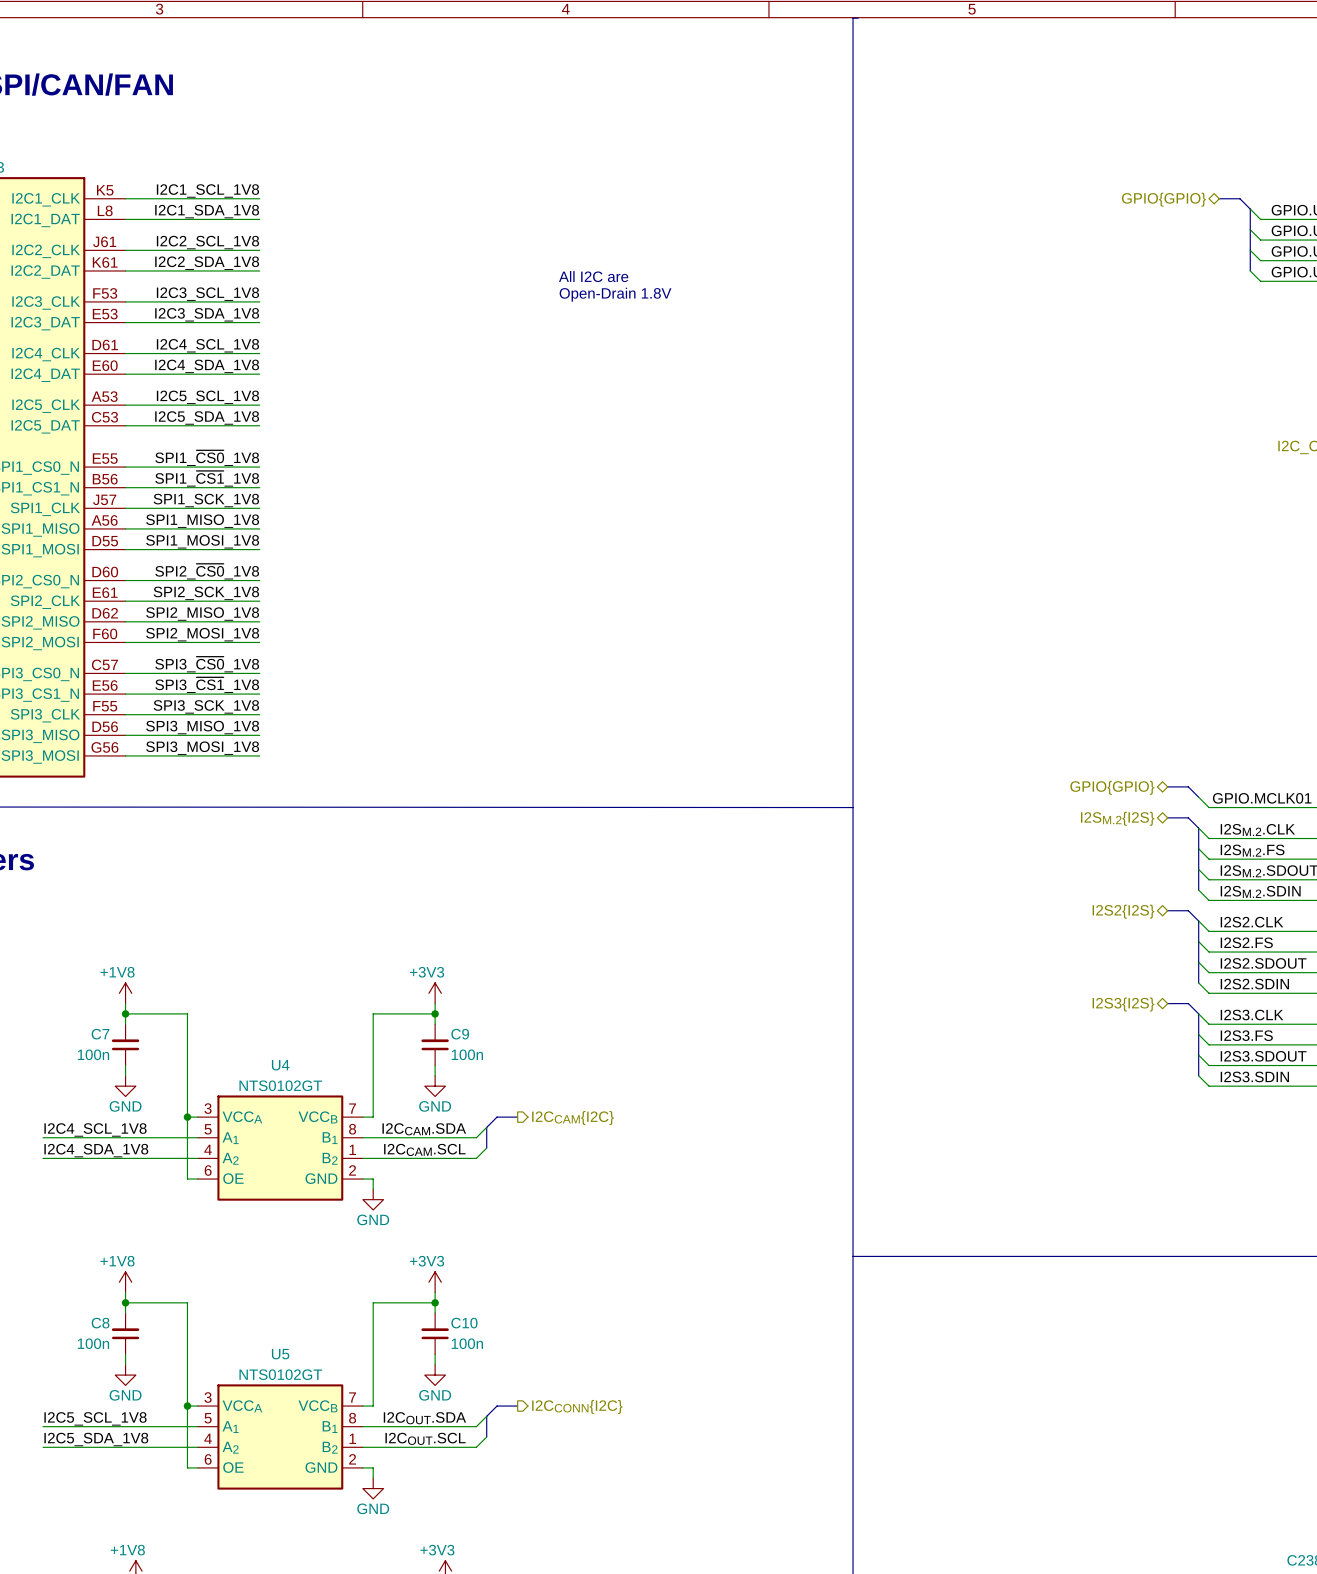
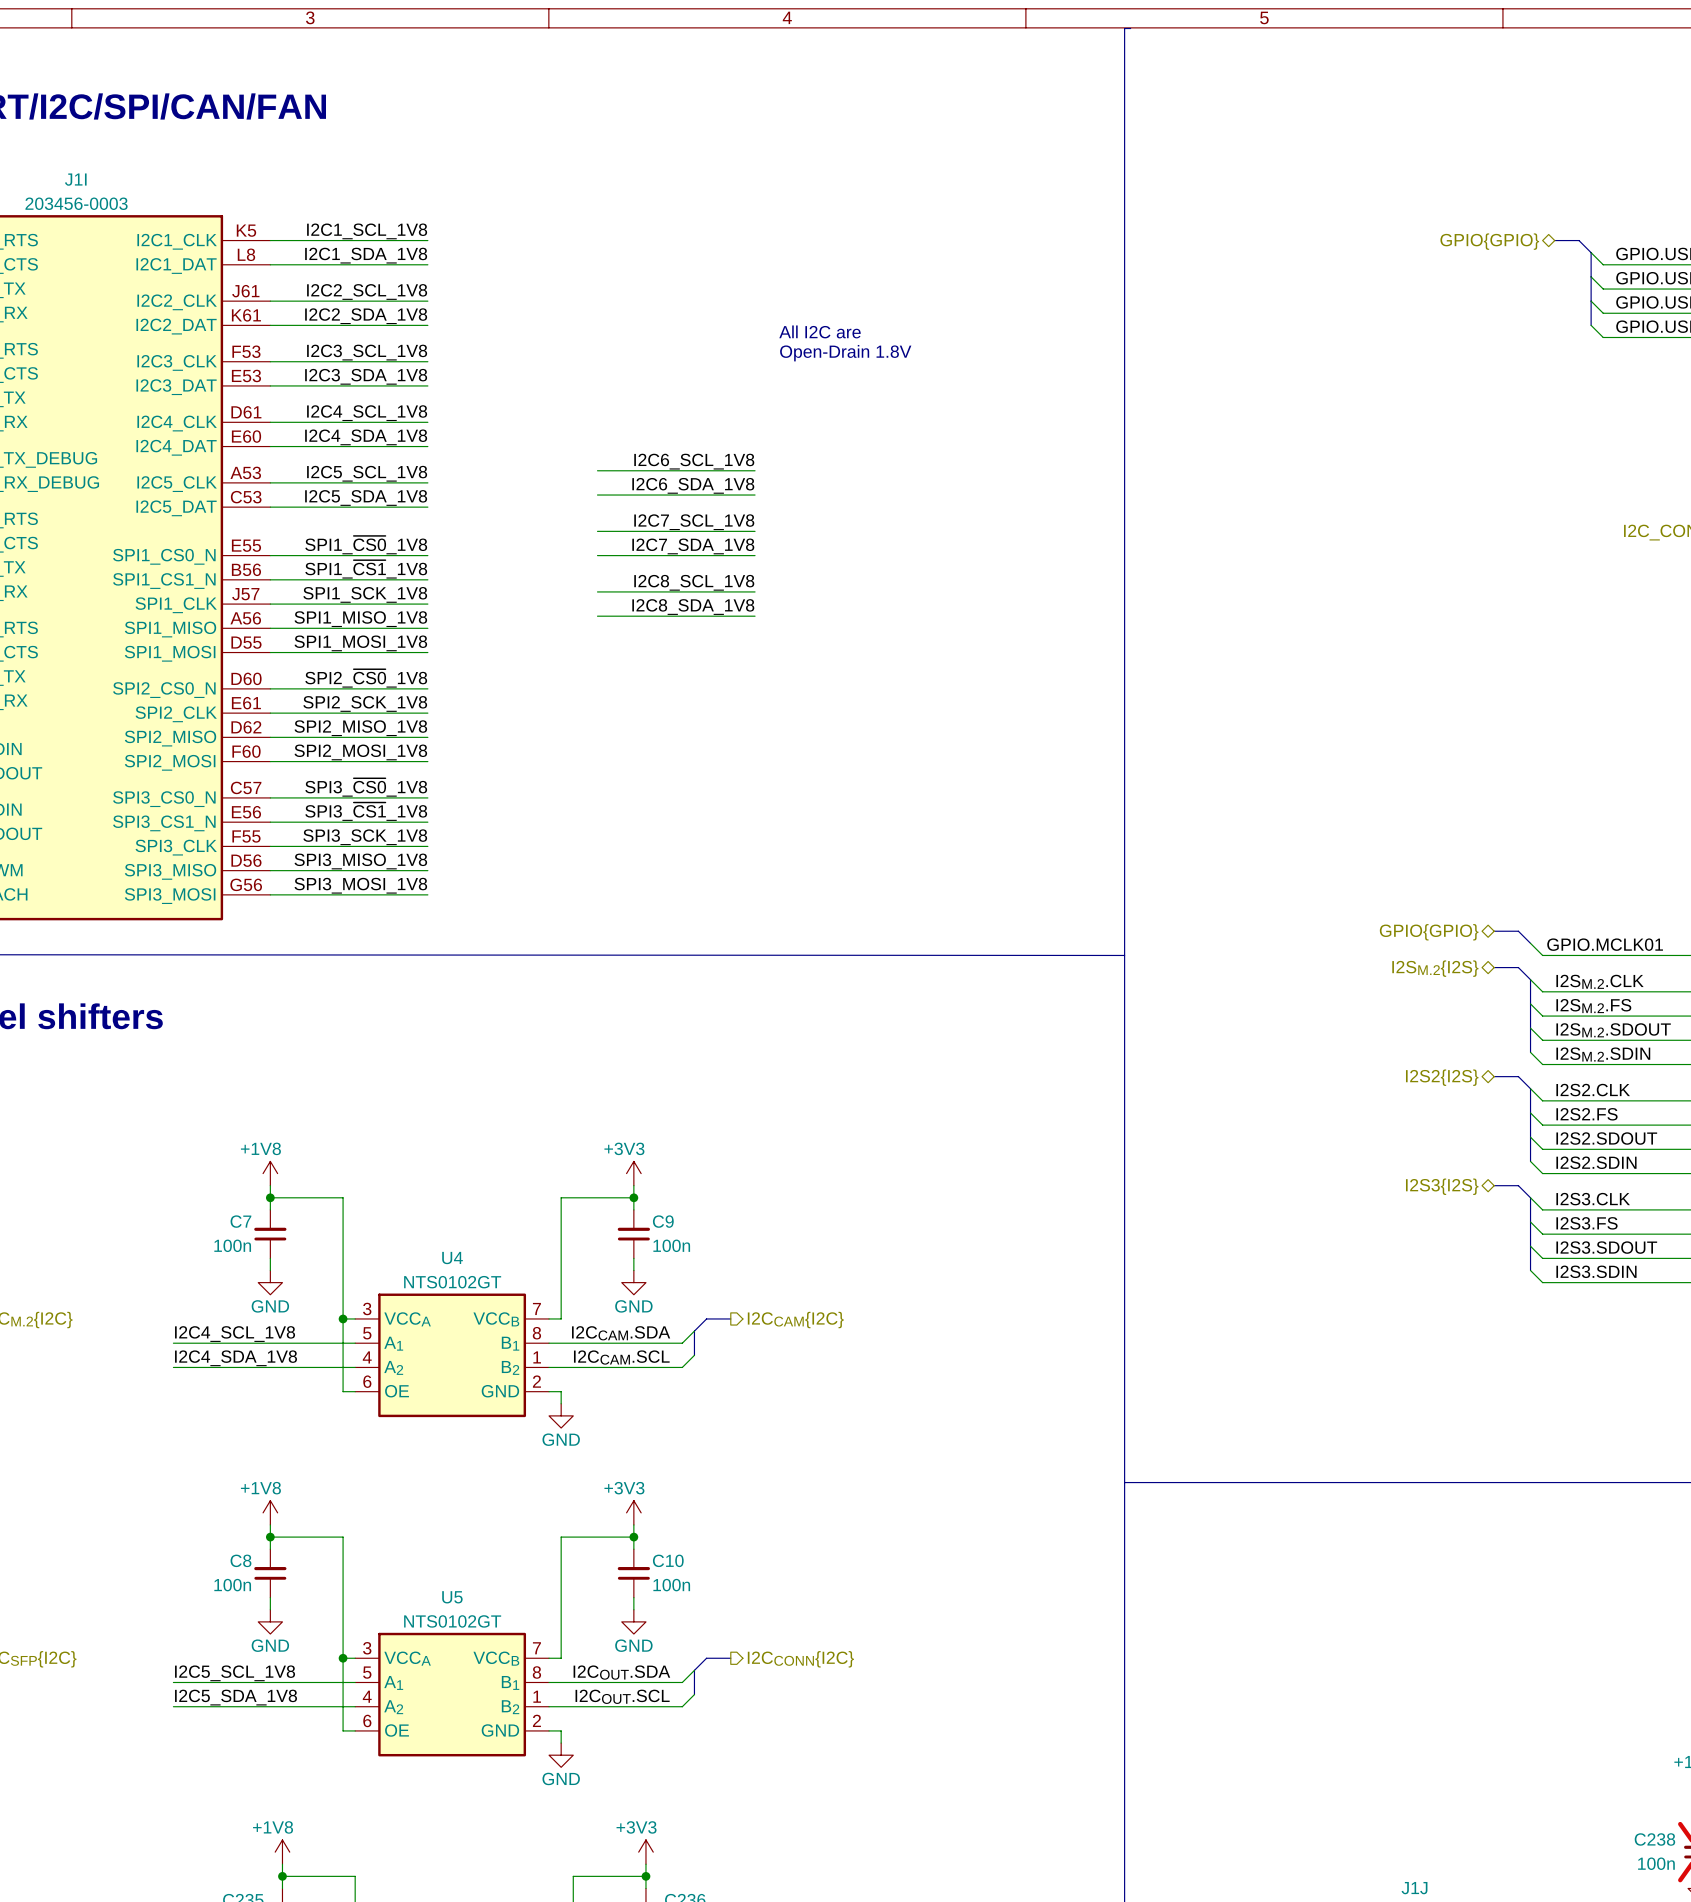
label: none -> I2C6_SCL_1V8 (694, 461)
wire: none -> (597, 470) (755, 470)
label: none -> I2C6_SDA_1V8 (693, 485)
wire: none -> (597, 495) (755, 495)
label: none -> I2C7_SCL_1V8 (694, 522)
wire: none -> (597, 531) (755, 531)
label: none -> I2C7_SDA_1V8 (693, 546)
wire: none -> (597, 555) (755, 555)
label: none -> I2C8_SCL_1V8 (694, 582)
wire: none -> (597, 591) (755, 591)
label: none -> I2C8_SDA_1V8 (693, 607)
wire: none -> (597, 616) (755, 616)

